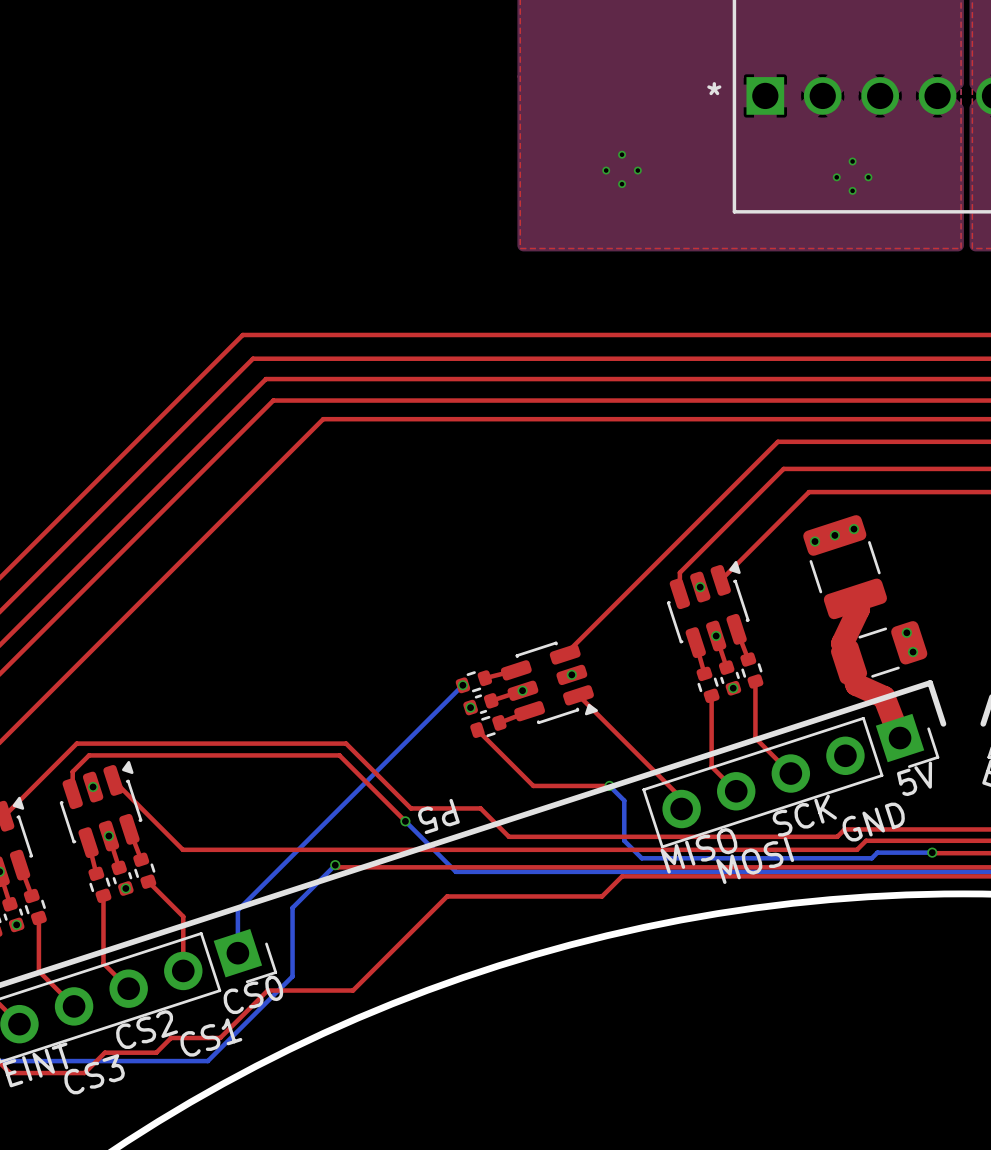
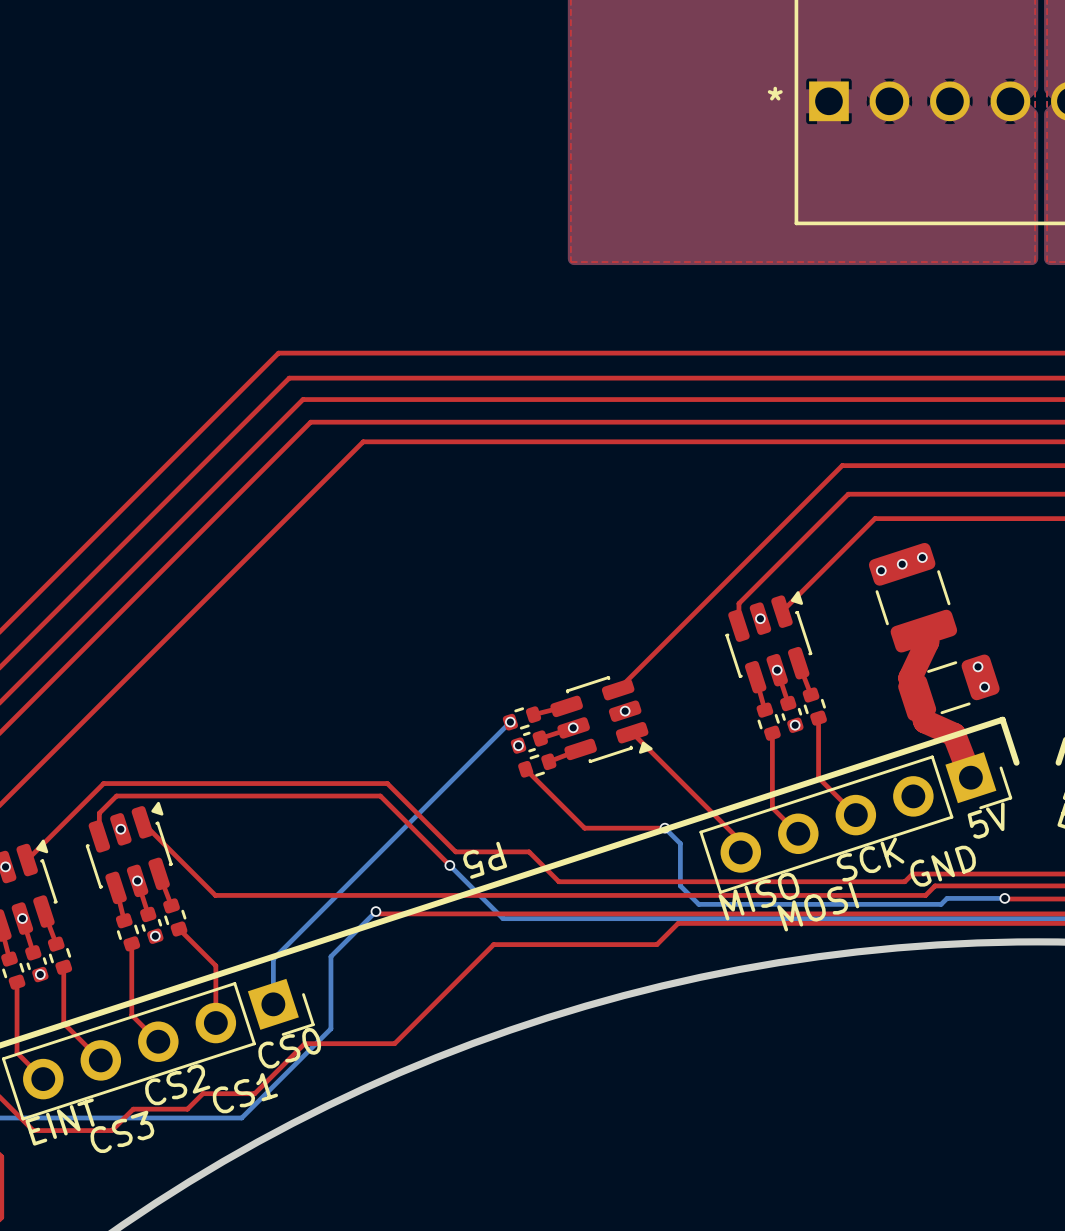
via: (622, 154) -> none
via: (852, 161) -> none
via: (606, 170) -> none
via: (637, 170) -> none
via: (836, 177) -> none
via: (868, 177) -> none
via: (622, 184) -> none
via: (852, 190) -> none

